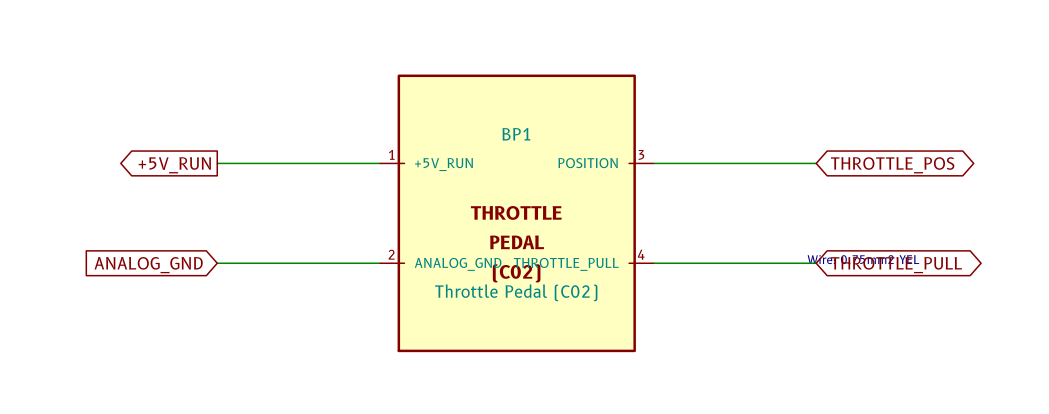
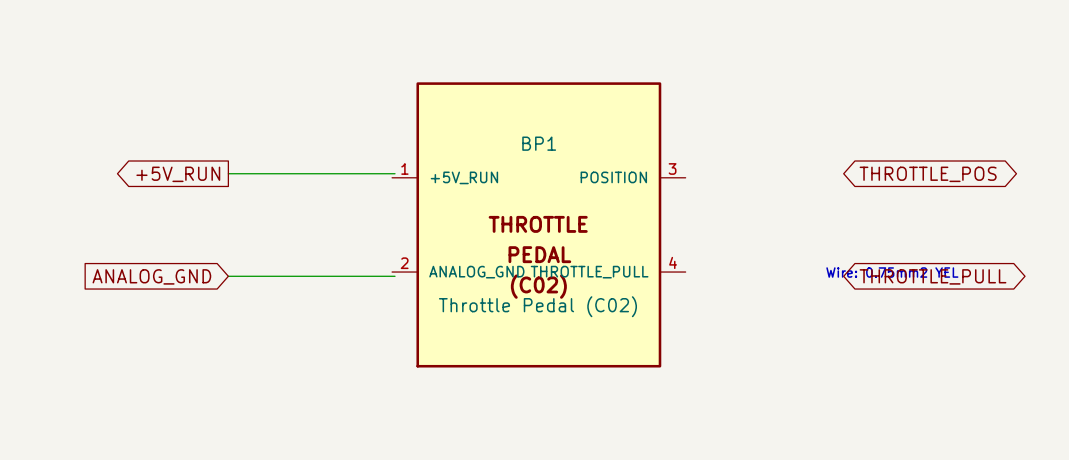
BP1 symbol: [379, 74, 655, 353] -> [392, 82, 686, 368]
wire: (654, 163) (816, 163) -> none
wire: (654, 263) (816, 263) -> none

